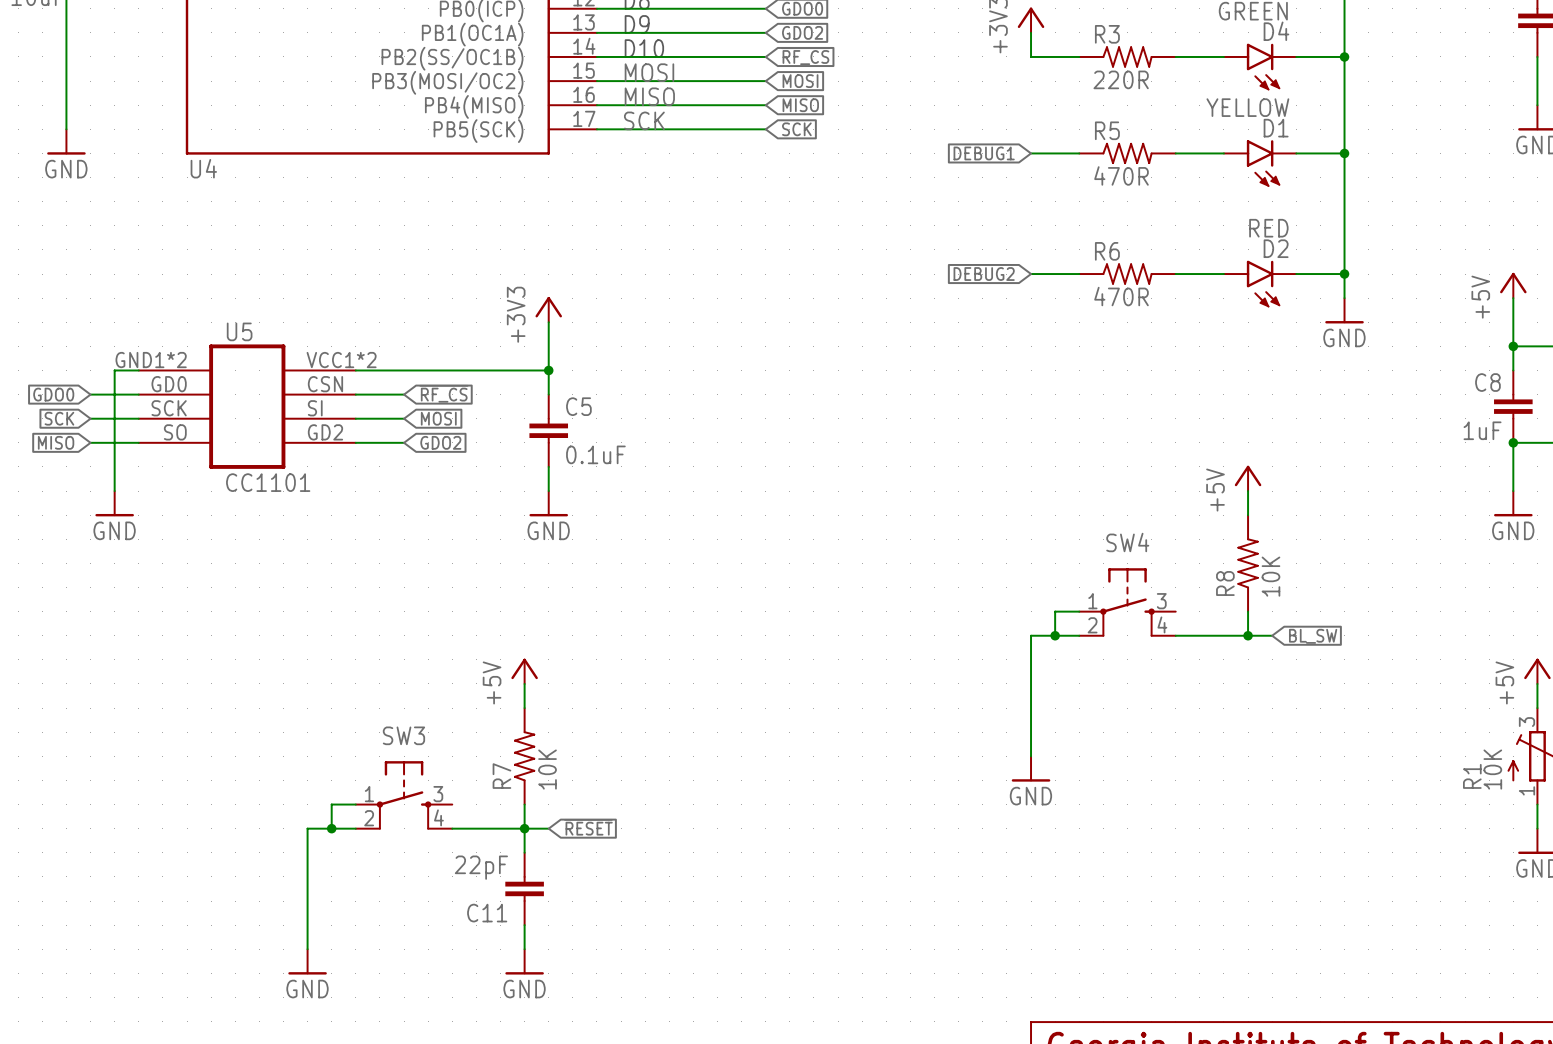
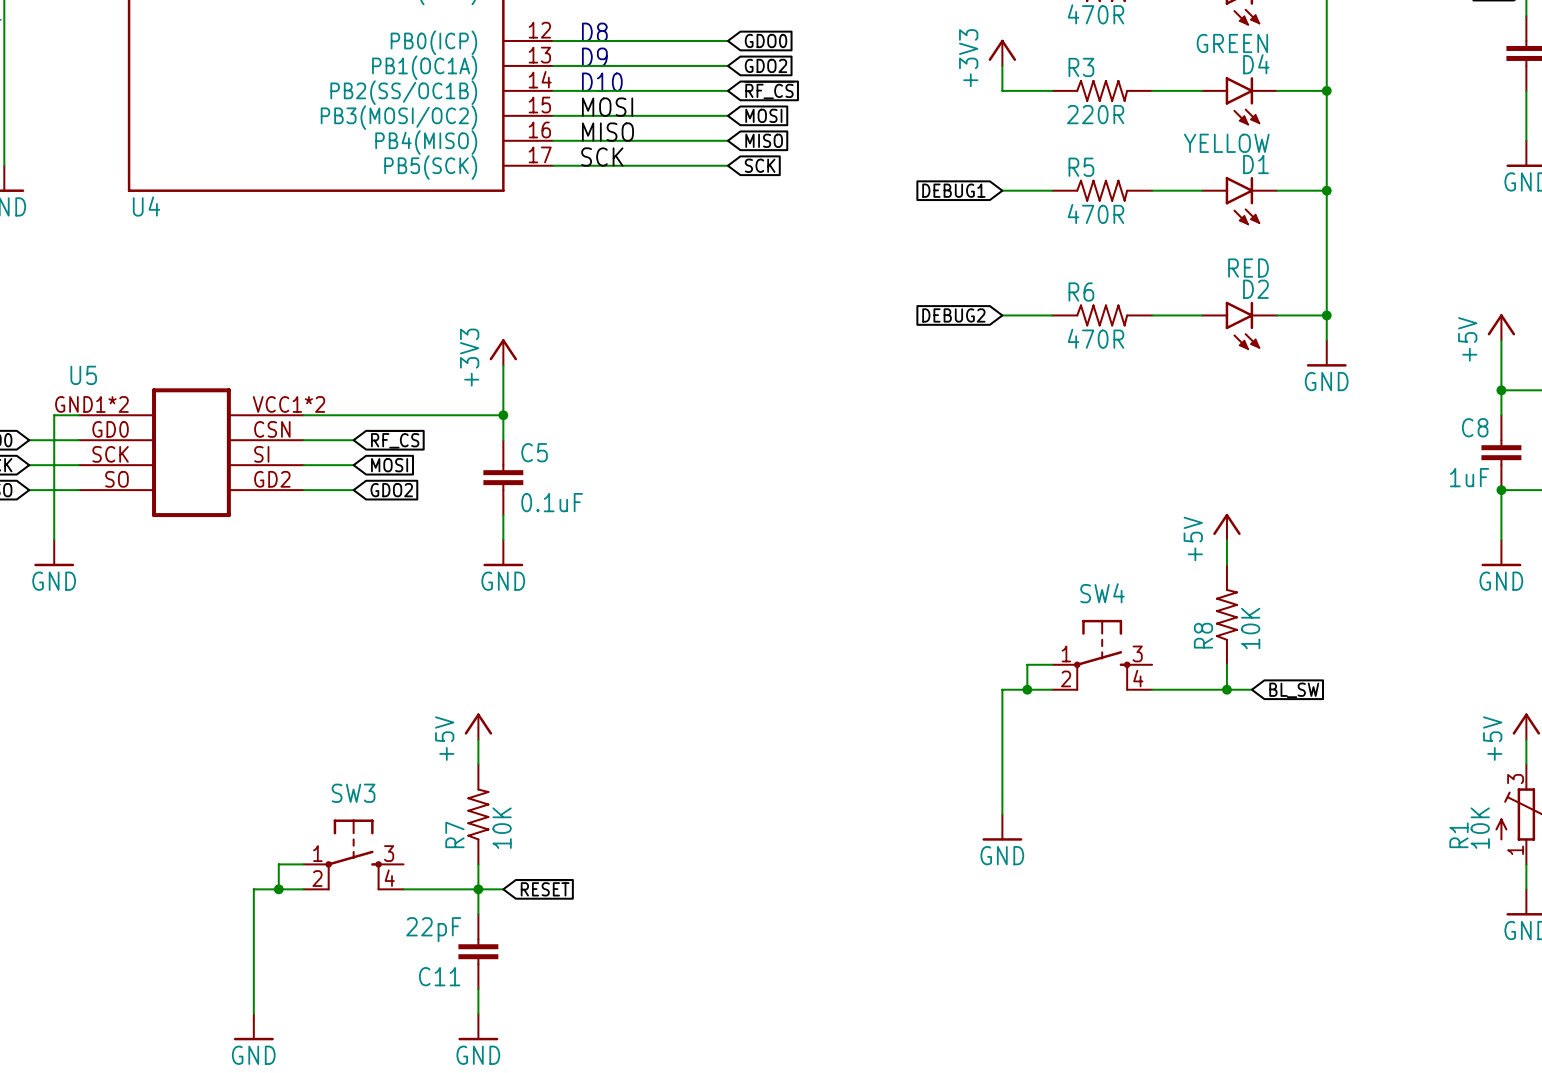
U5 name position: U5 (239, 331) -> U5 (83, 375)
U5 value: CC1101 (268, 482) -> none

